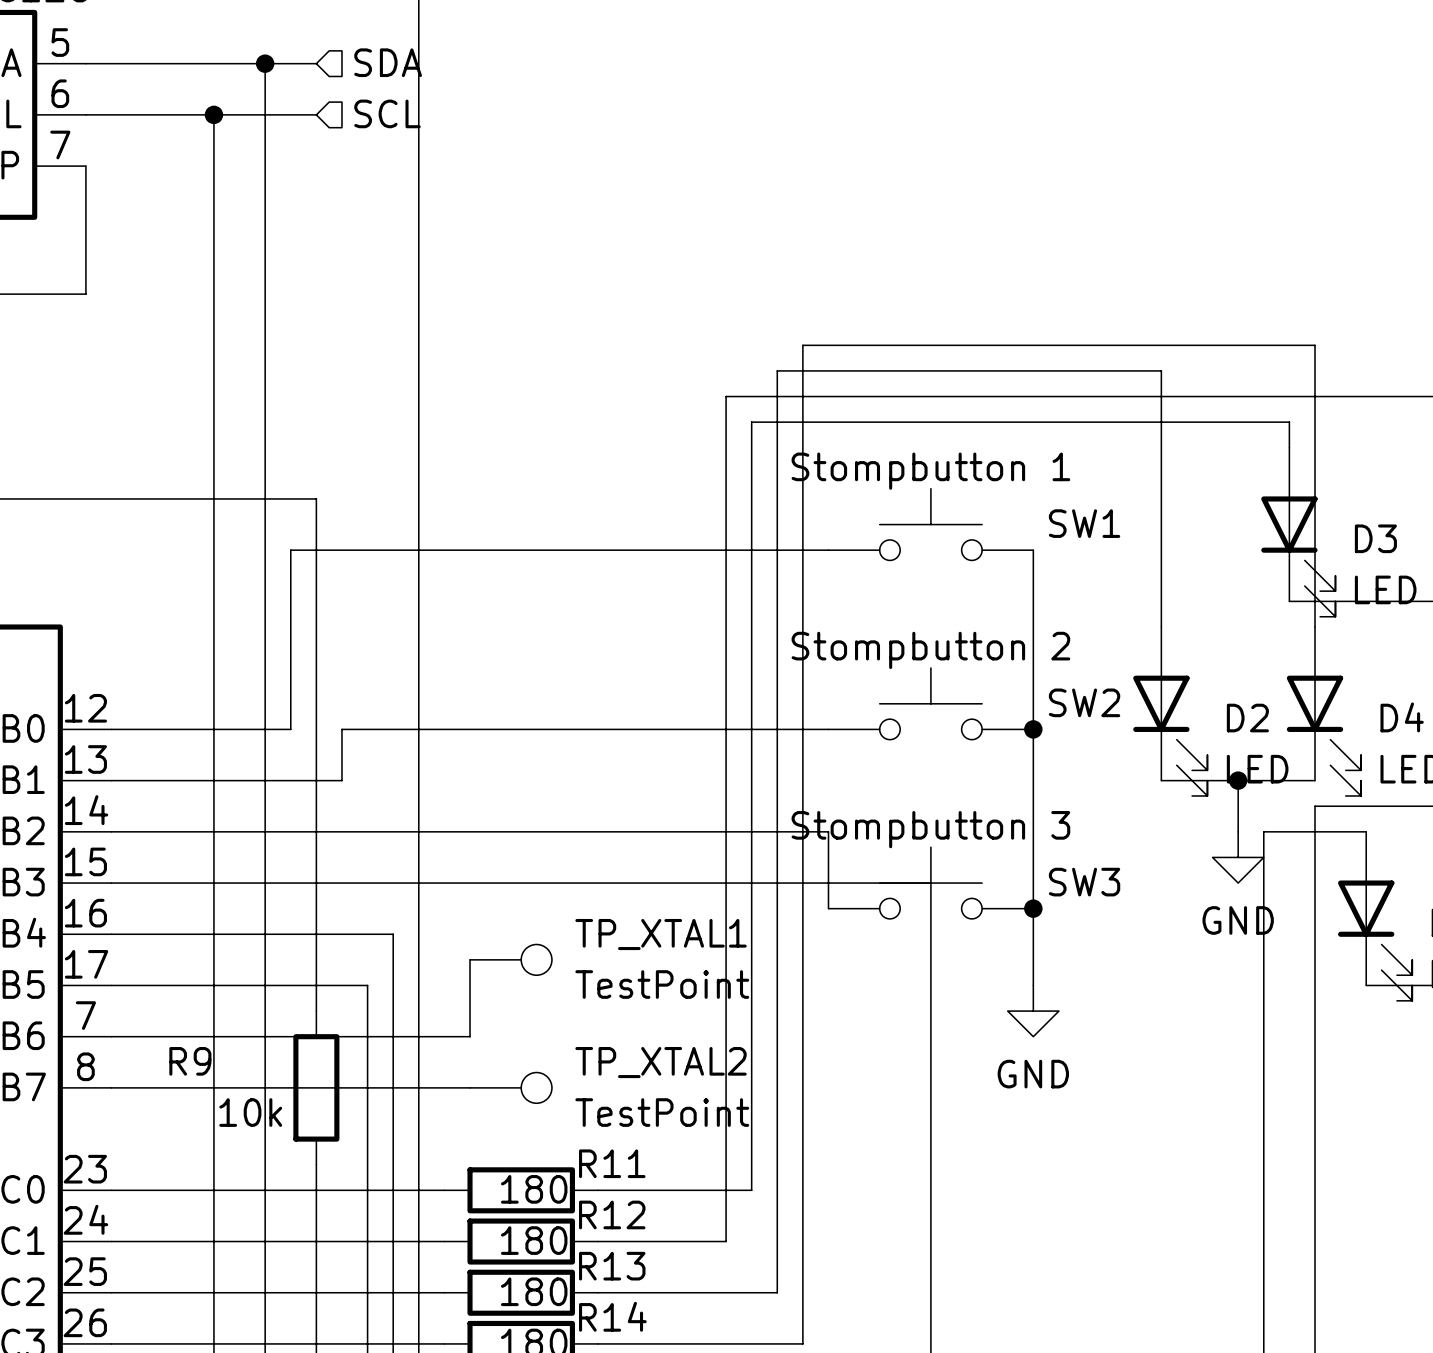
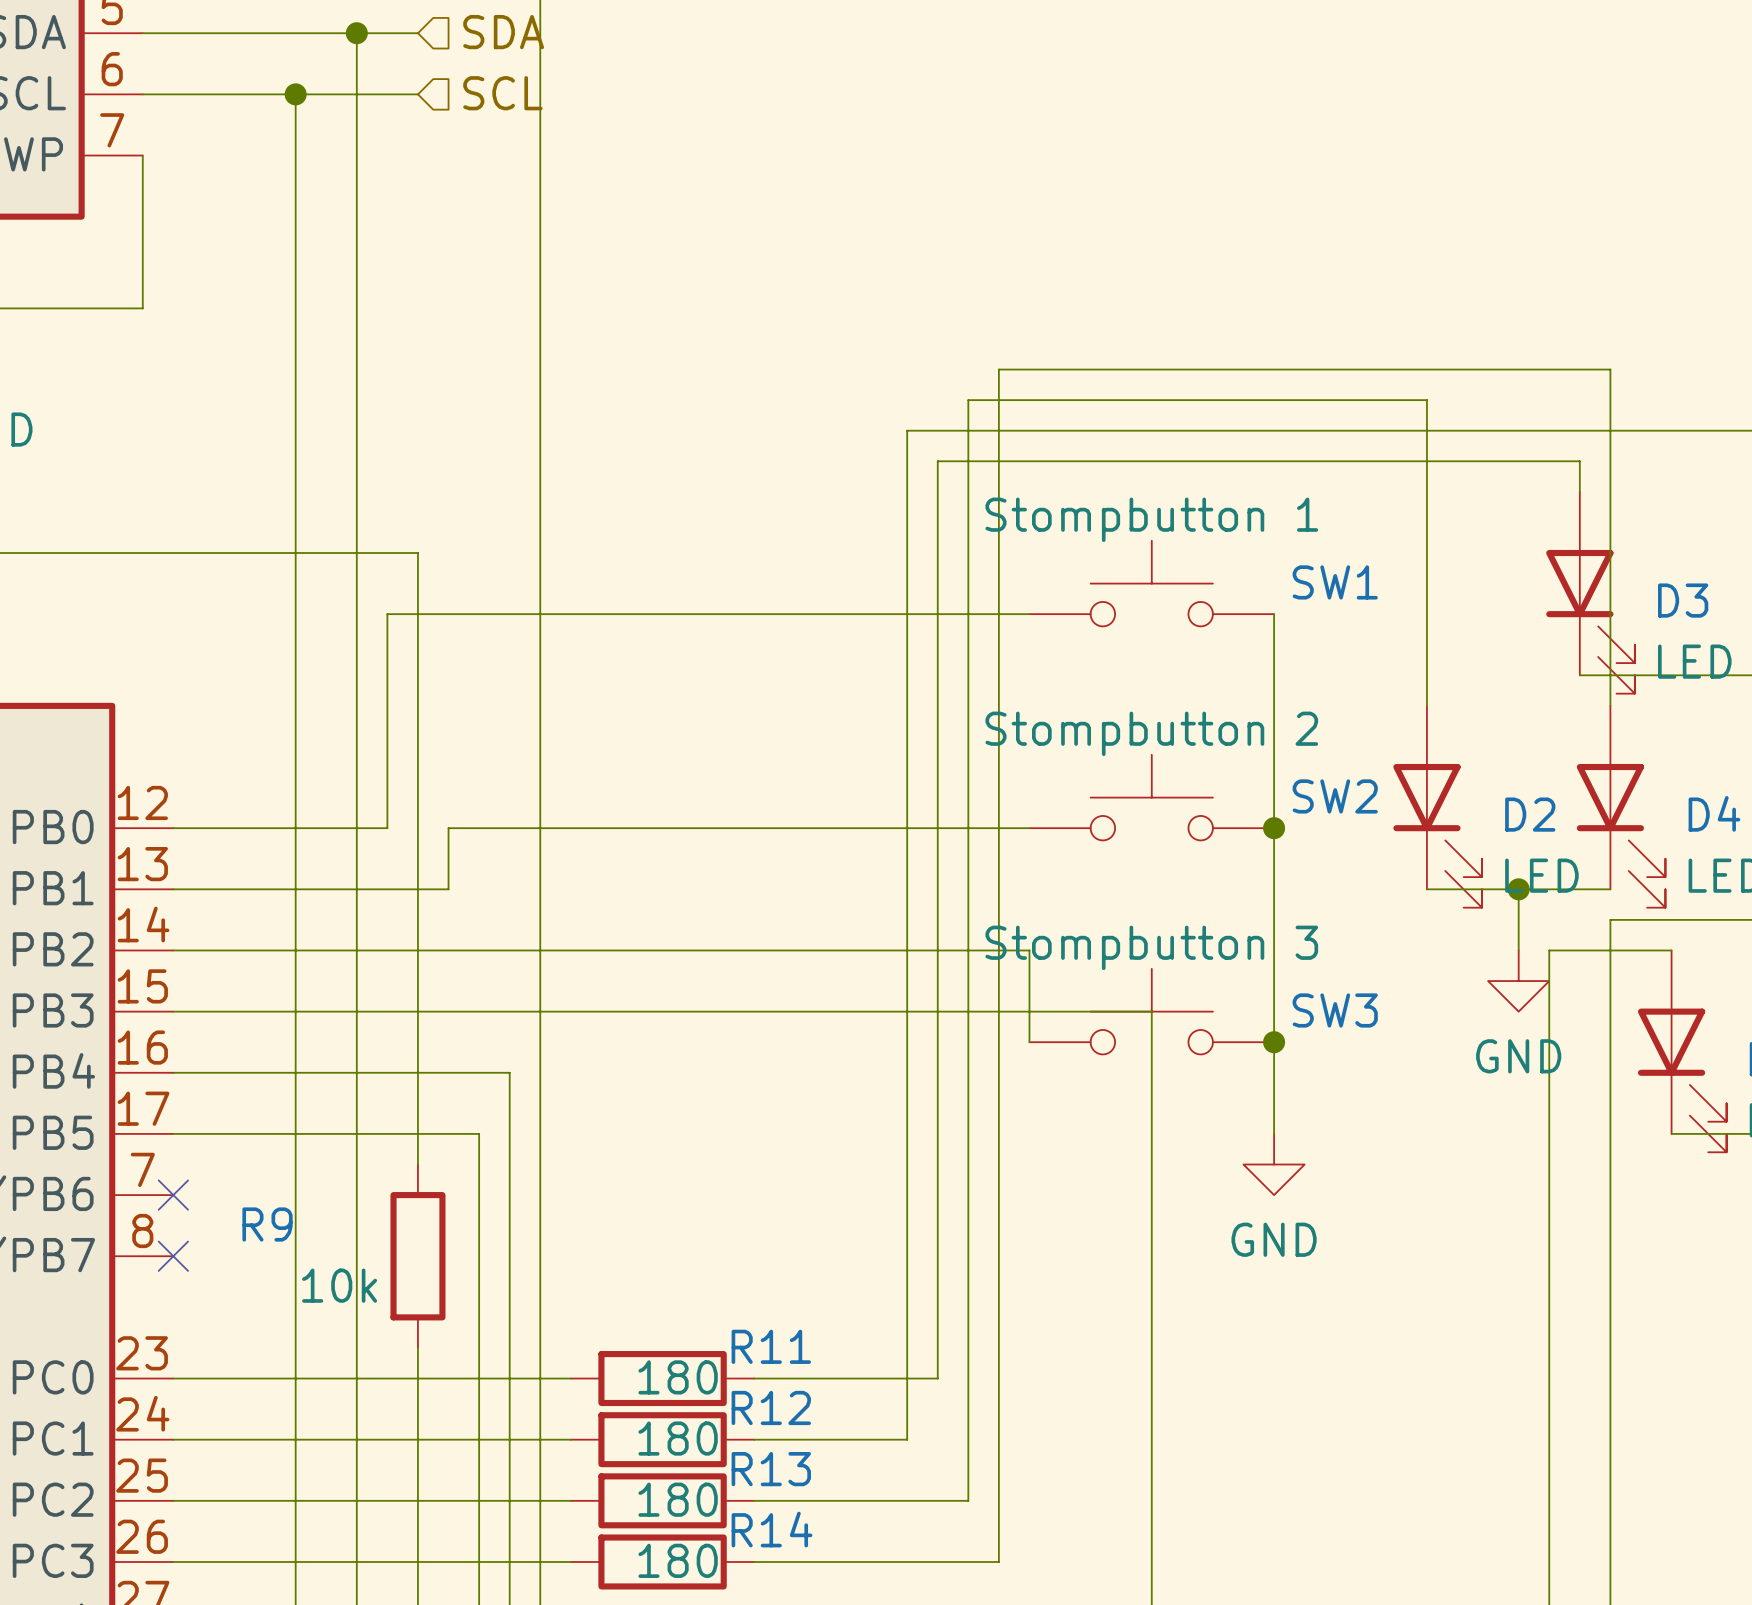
wire: (470, 959) (470, 1036) (111, 1036) -> none
TP_XTAL1: TestPoint (510, 959) -> none
no-connect mark: none -> (173, 1195)
wire: (111, 1087) (470, 1087) -> none
no-connect mark: none -> (173, 1256)
TP_XTAL2: TestPoint (510, 1087) -> none

